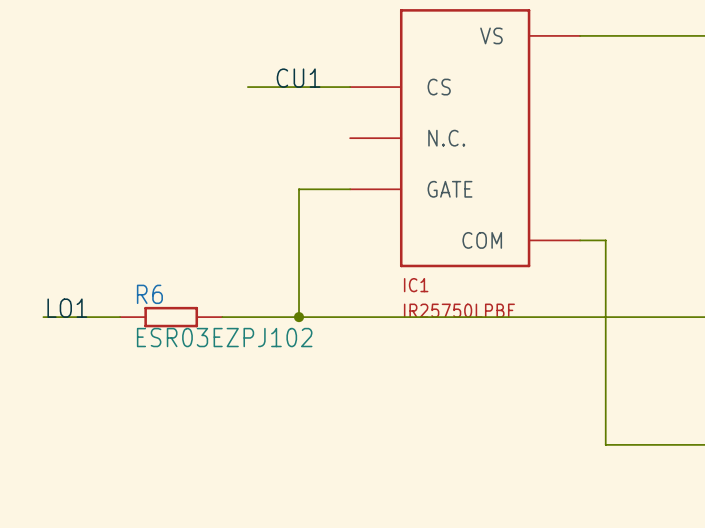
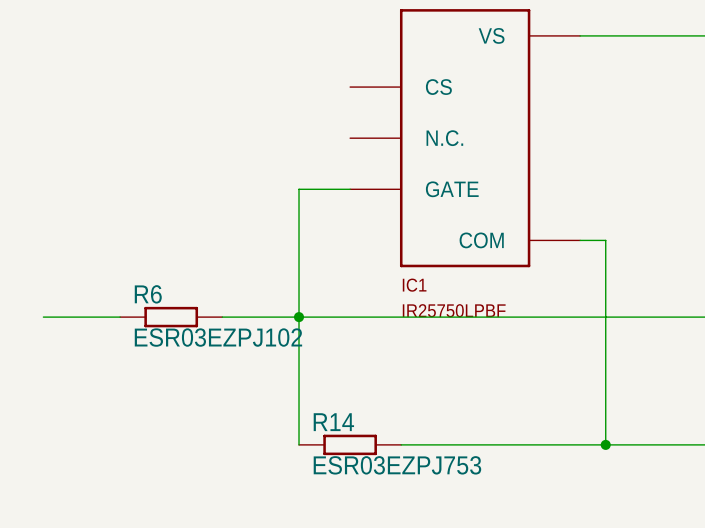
label: CU1 (298, 78) -> none
wire: (247, 87) (350, 87) -> none
label: LO1 (67, 308) -> none
wire: none -> (299, 317) (299, 444)
R14: none -> ESR03EZPJ753 (350, 444)
wire: none -> (401, 444) (605, 444)
junction: none -> (605, 444)

